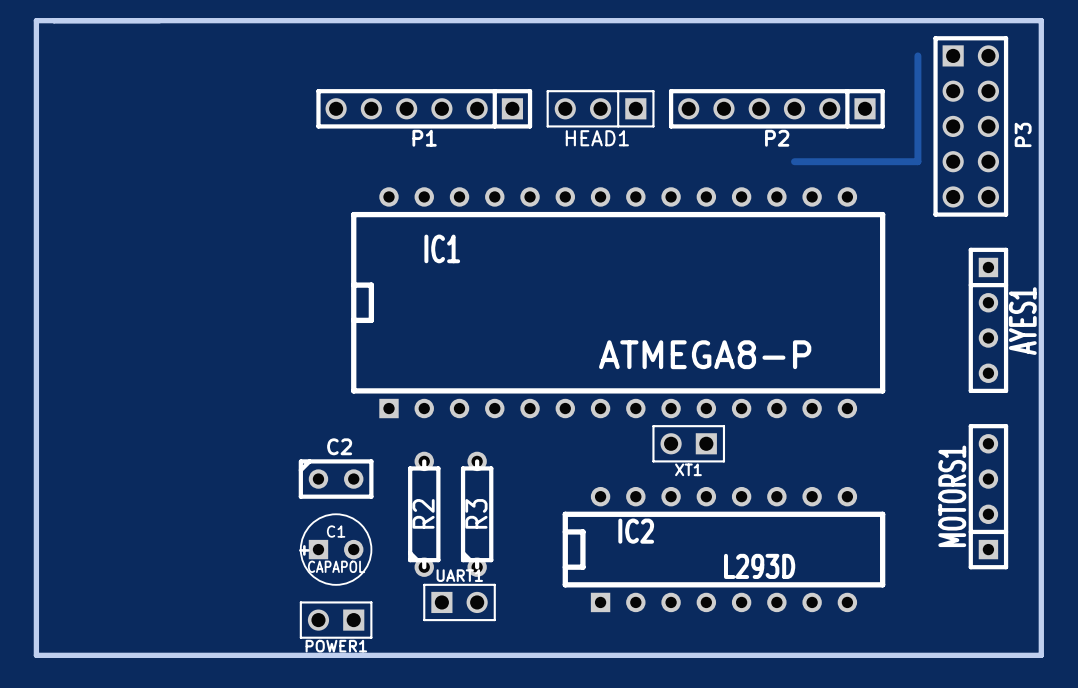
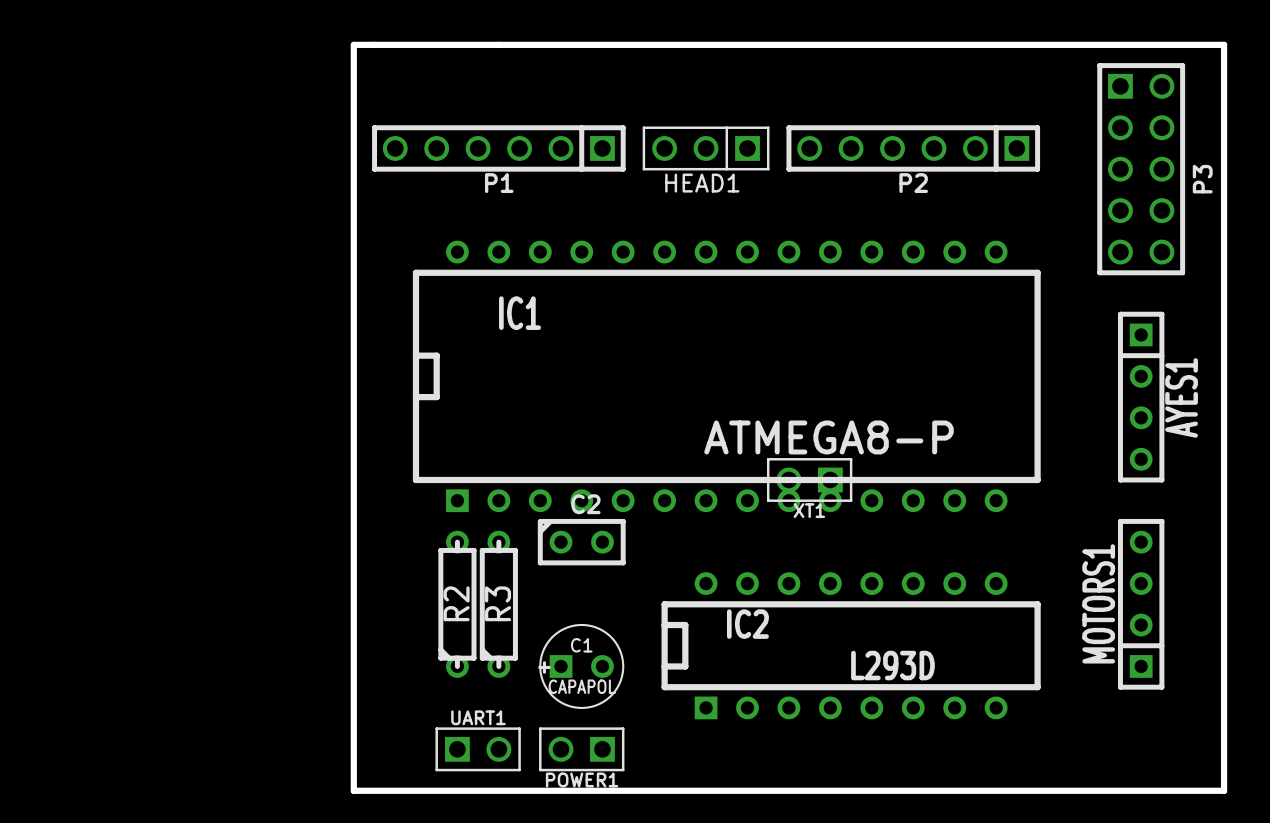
board edge: (300, 20) (36, 20) (36, 655) (300, 655) -> (353, 44) (353, 790)
track: (917, 55) (917, 161) (794, 161) -> none
AYES1 position: (988, 320) -> (1141, 397)
XT1 position: (688, 443) -> (809, 479)
C2 position: (336, 479) -> (581, 542)
MOTORS1 position: (988, 496) -> (1141, 604)
R2 position: (424, 514) -> (457, 604)
R3 position: (477, 514) -> (498, 604)
C1 position: (336, 549) -> (581, 666)
IC2 position: (723, 549) -> (851, 645)
UART1 position: (459, 602) -> (478, 749)
POWER1 position: (336, 620) -> (581, 749)

